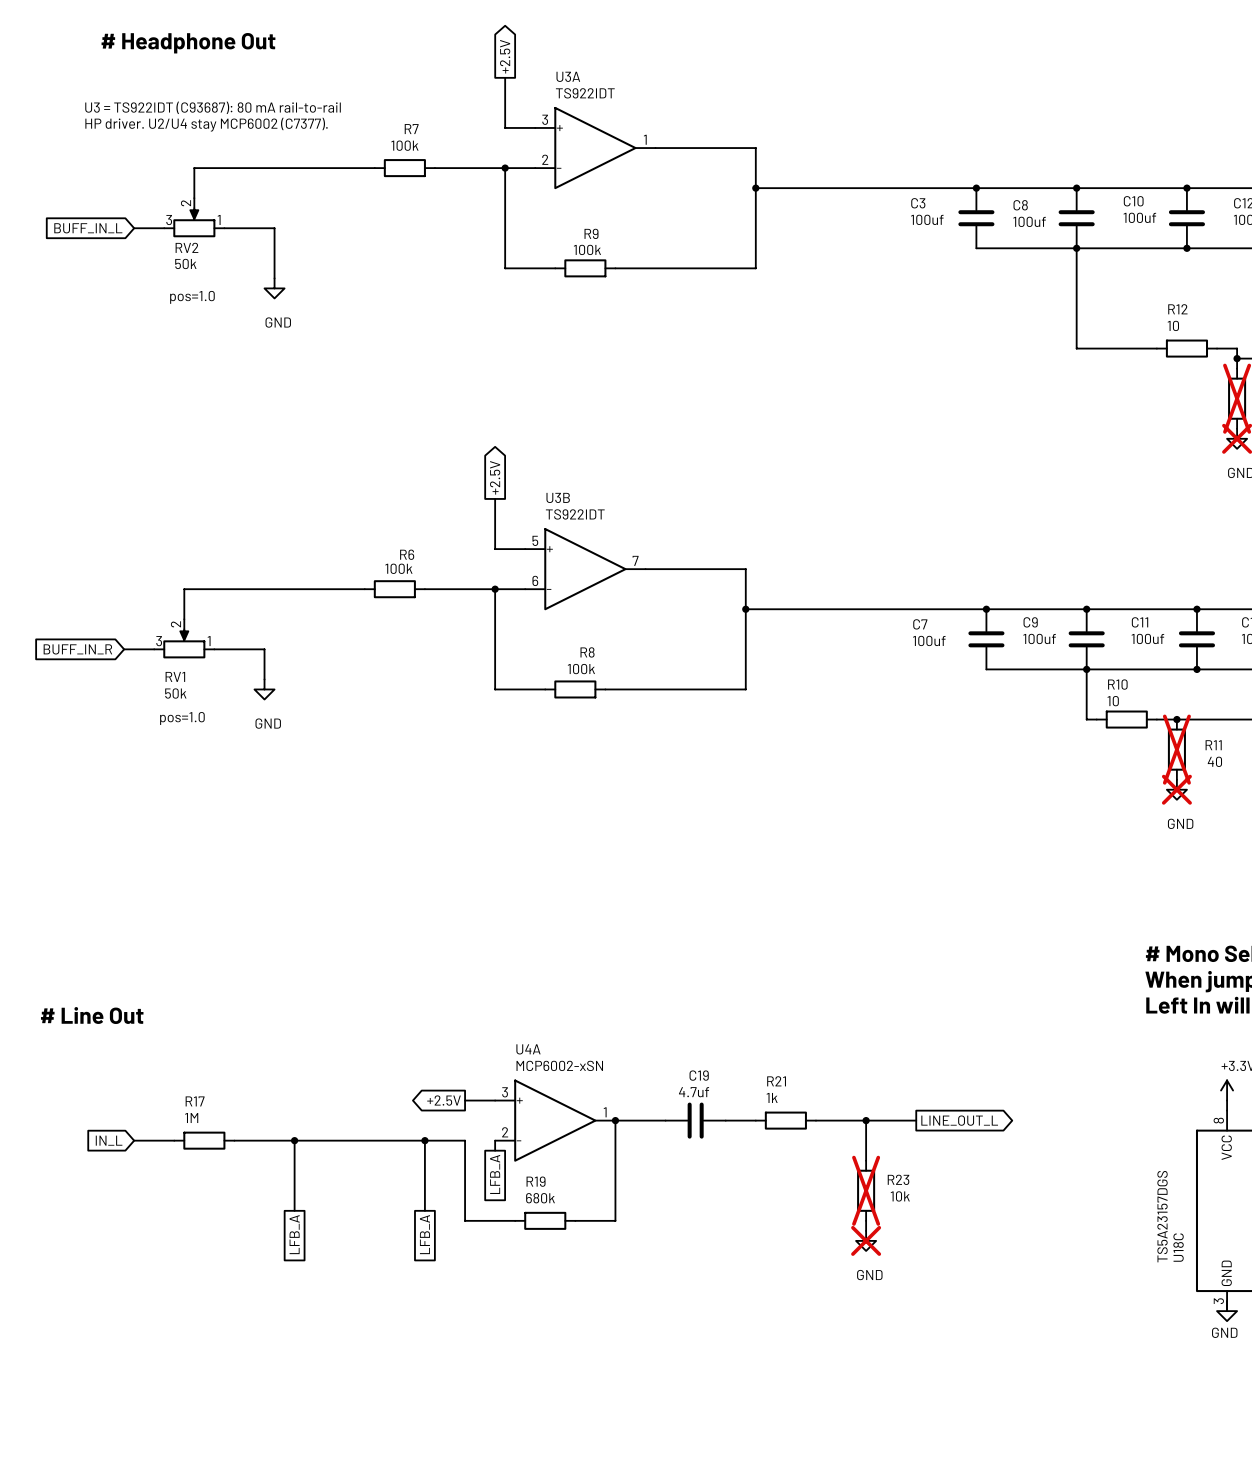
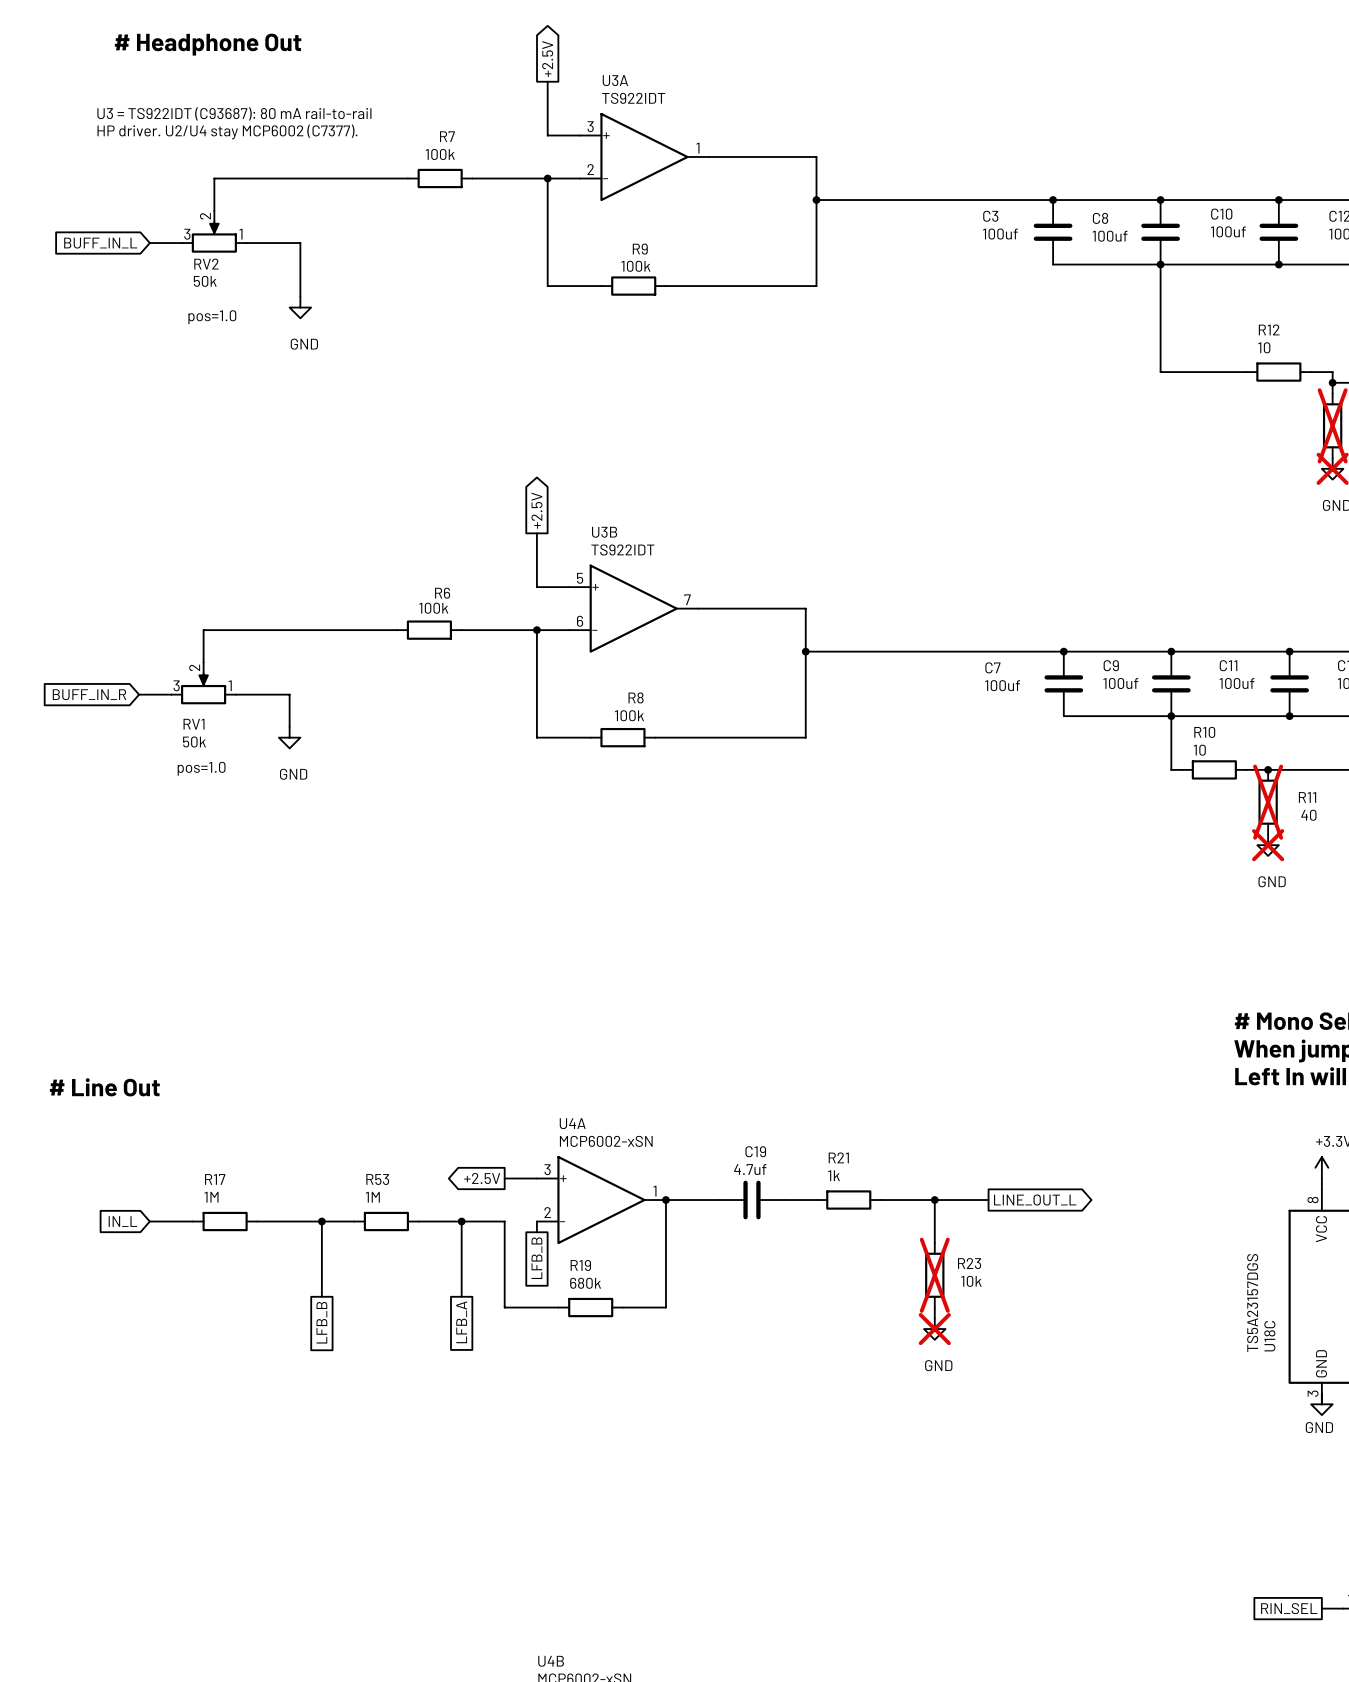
wire: (324, 1140) (384, 1140) -> none
R53: none -> 1M (386, 1221)
global label: LFB_A (495, 1174) -> LFB_B (536, 1258)
global label: LFB_A (294, 1234) -> LFB_B (321, 1322)

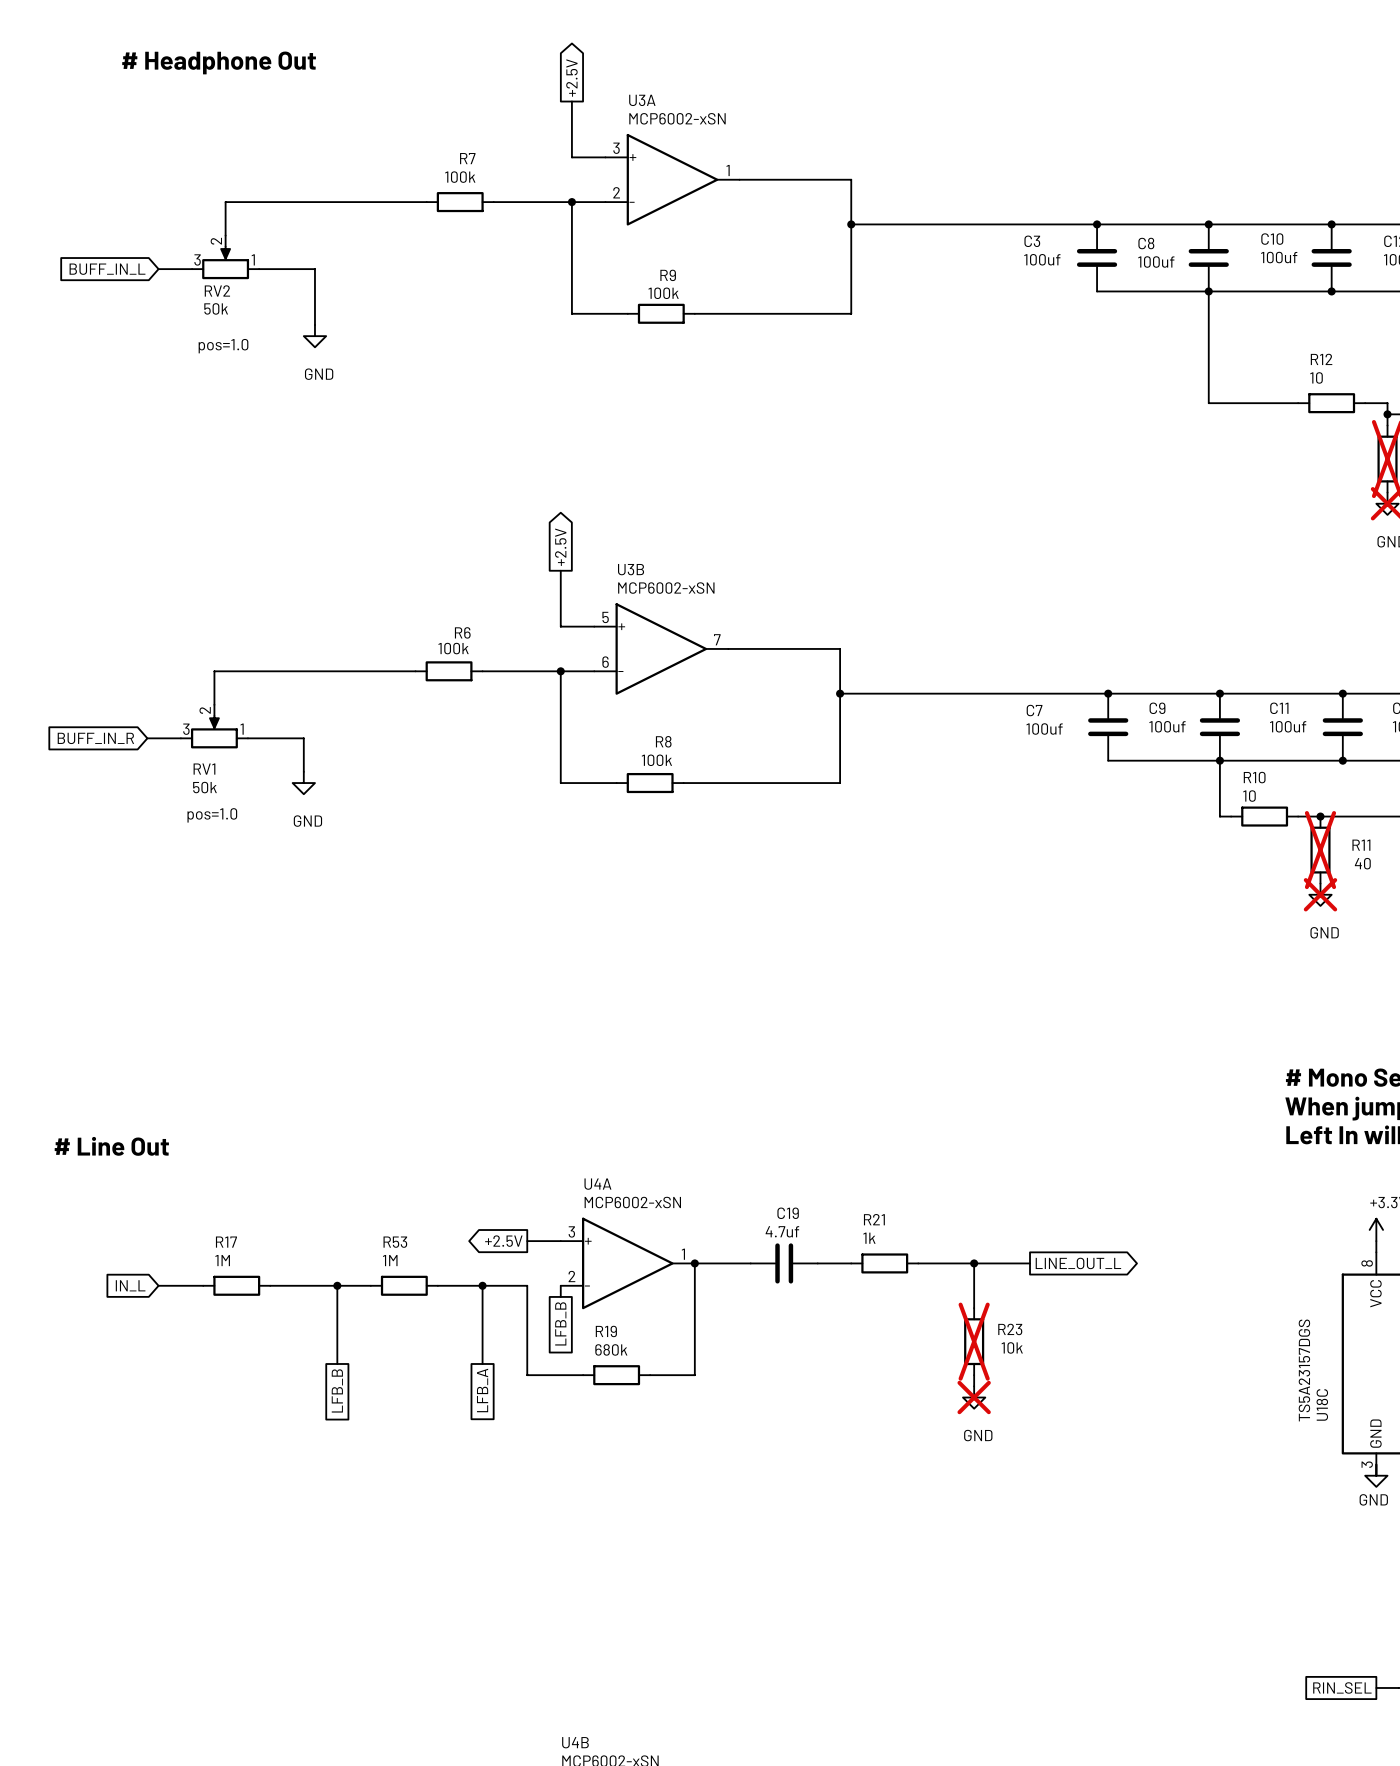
U3A value: TS922IDT (633, 98) -> MCP6002-xSN (677, 118)
text: U3 = TS922IDT (C93687): 80 mA rail-to-rail (234, 113) -> none
text: HP driver. U2/U4 stay MCP6002 (C7377). (227, 131) -> none
U3B value: TS922IDT (622, 549) -> MCP6002-xSN (666, 588)

